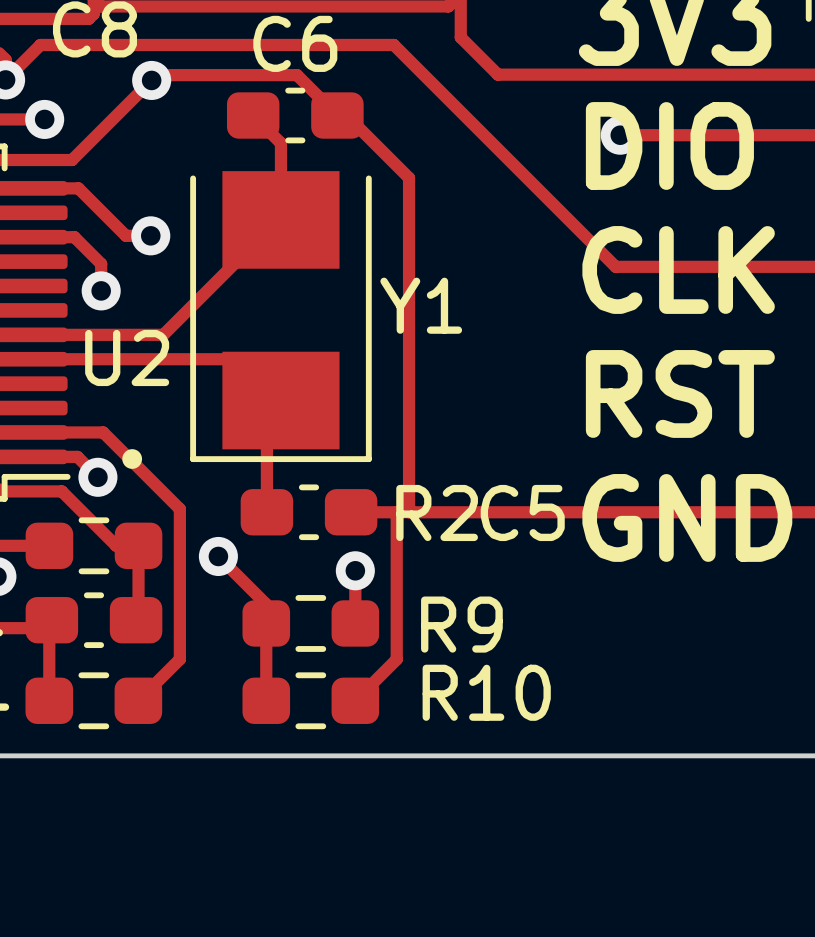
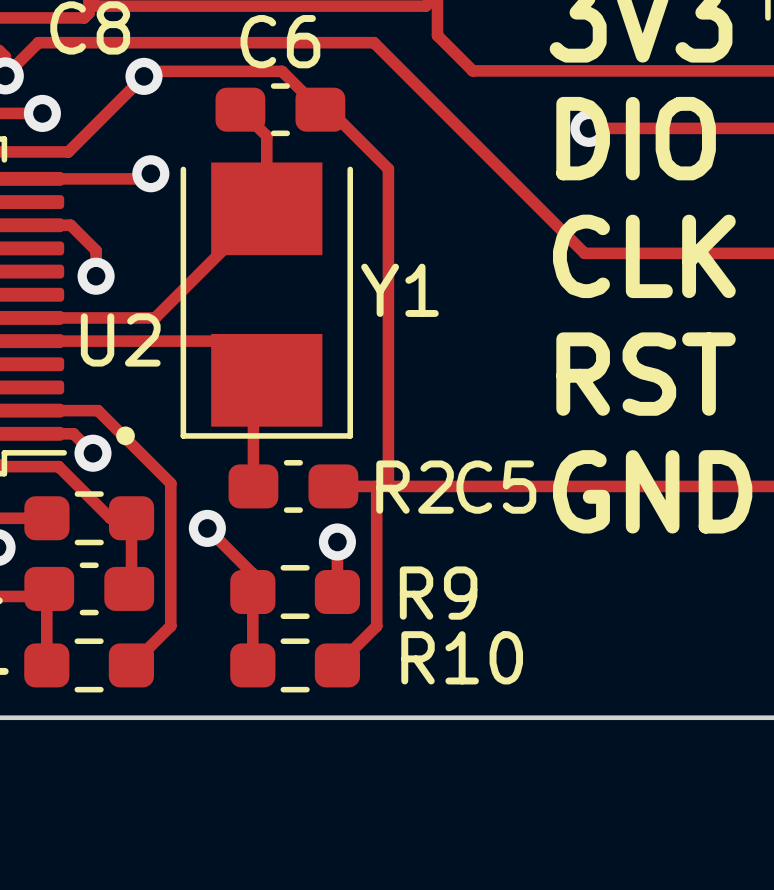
track: (78, 188) (125, 235) (150, 235) -> (74, 178) (145, 178) (150, 173)
via position: (150, 235) -> (150, 173)

